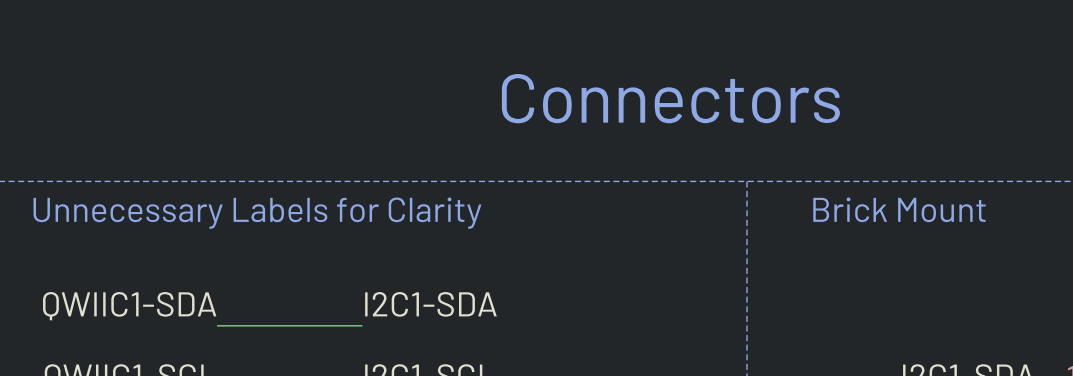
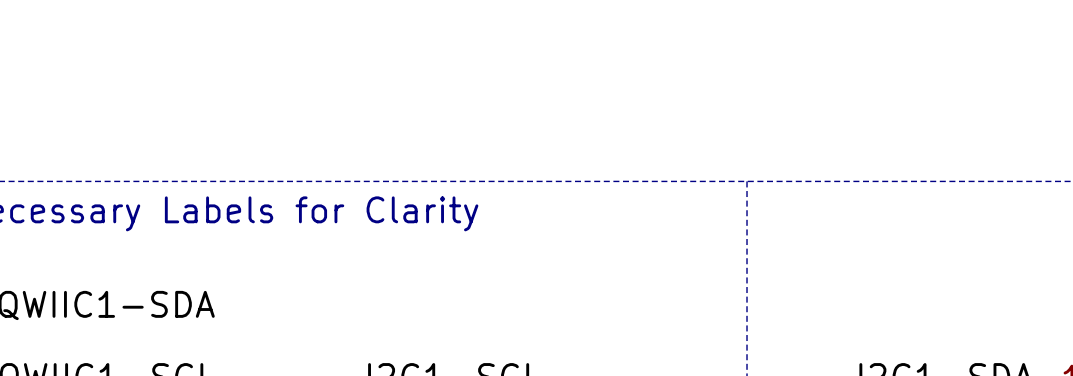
text: Connectors (670, 98) -> none
text: Brick Mount (899, 209) -> none
label: I2C1-SDA (430, 304) -> none
wire: (217, 325) (361, 325) -> none

